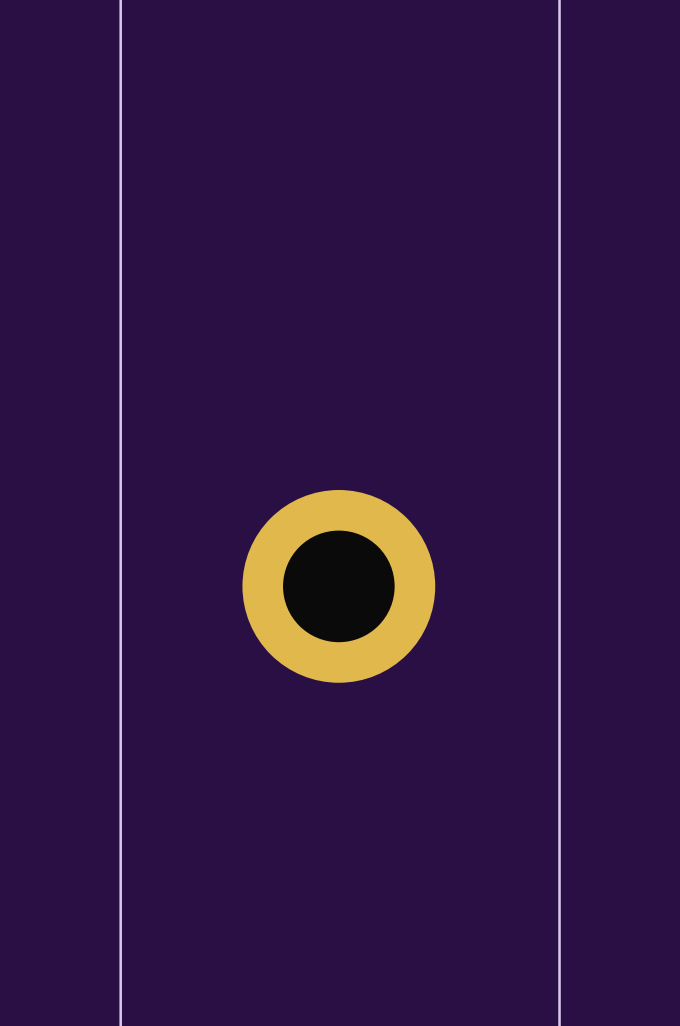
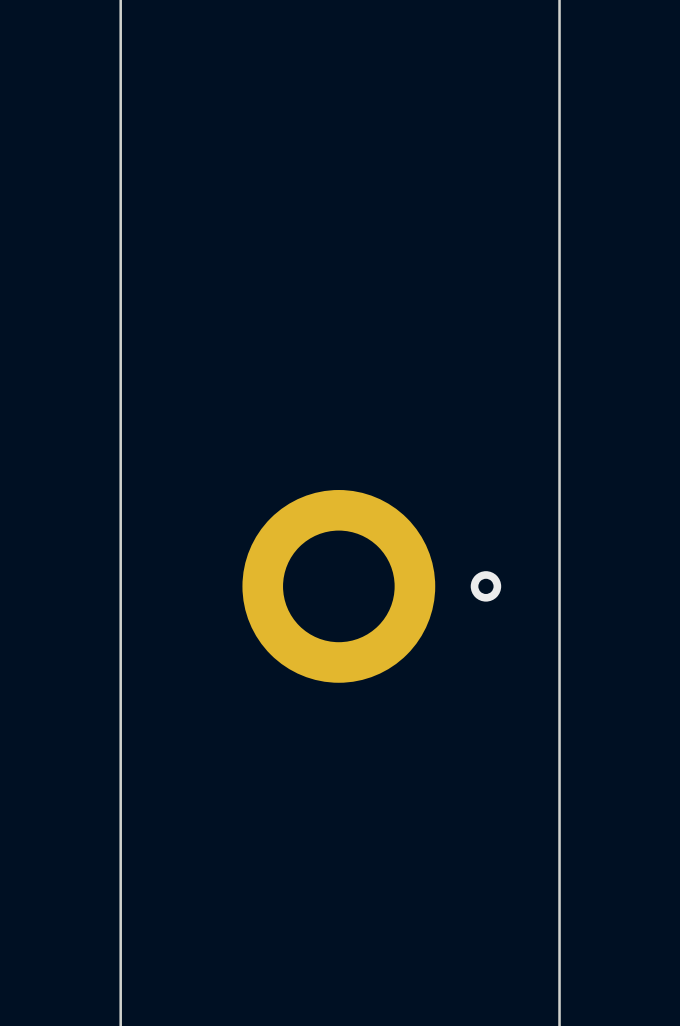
via: none -> (485, 586)

